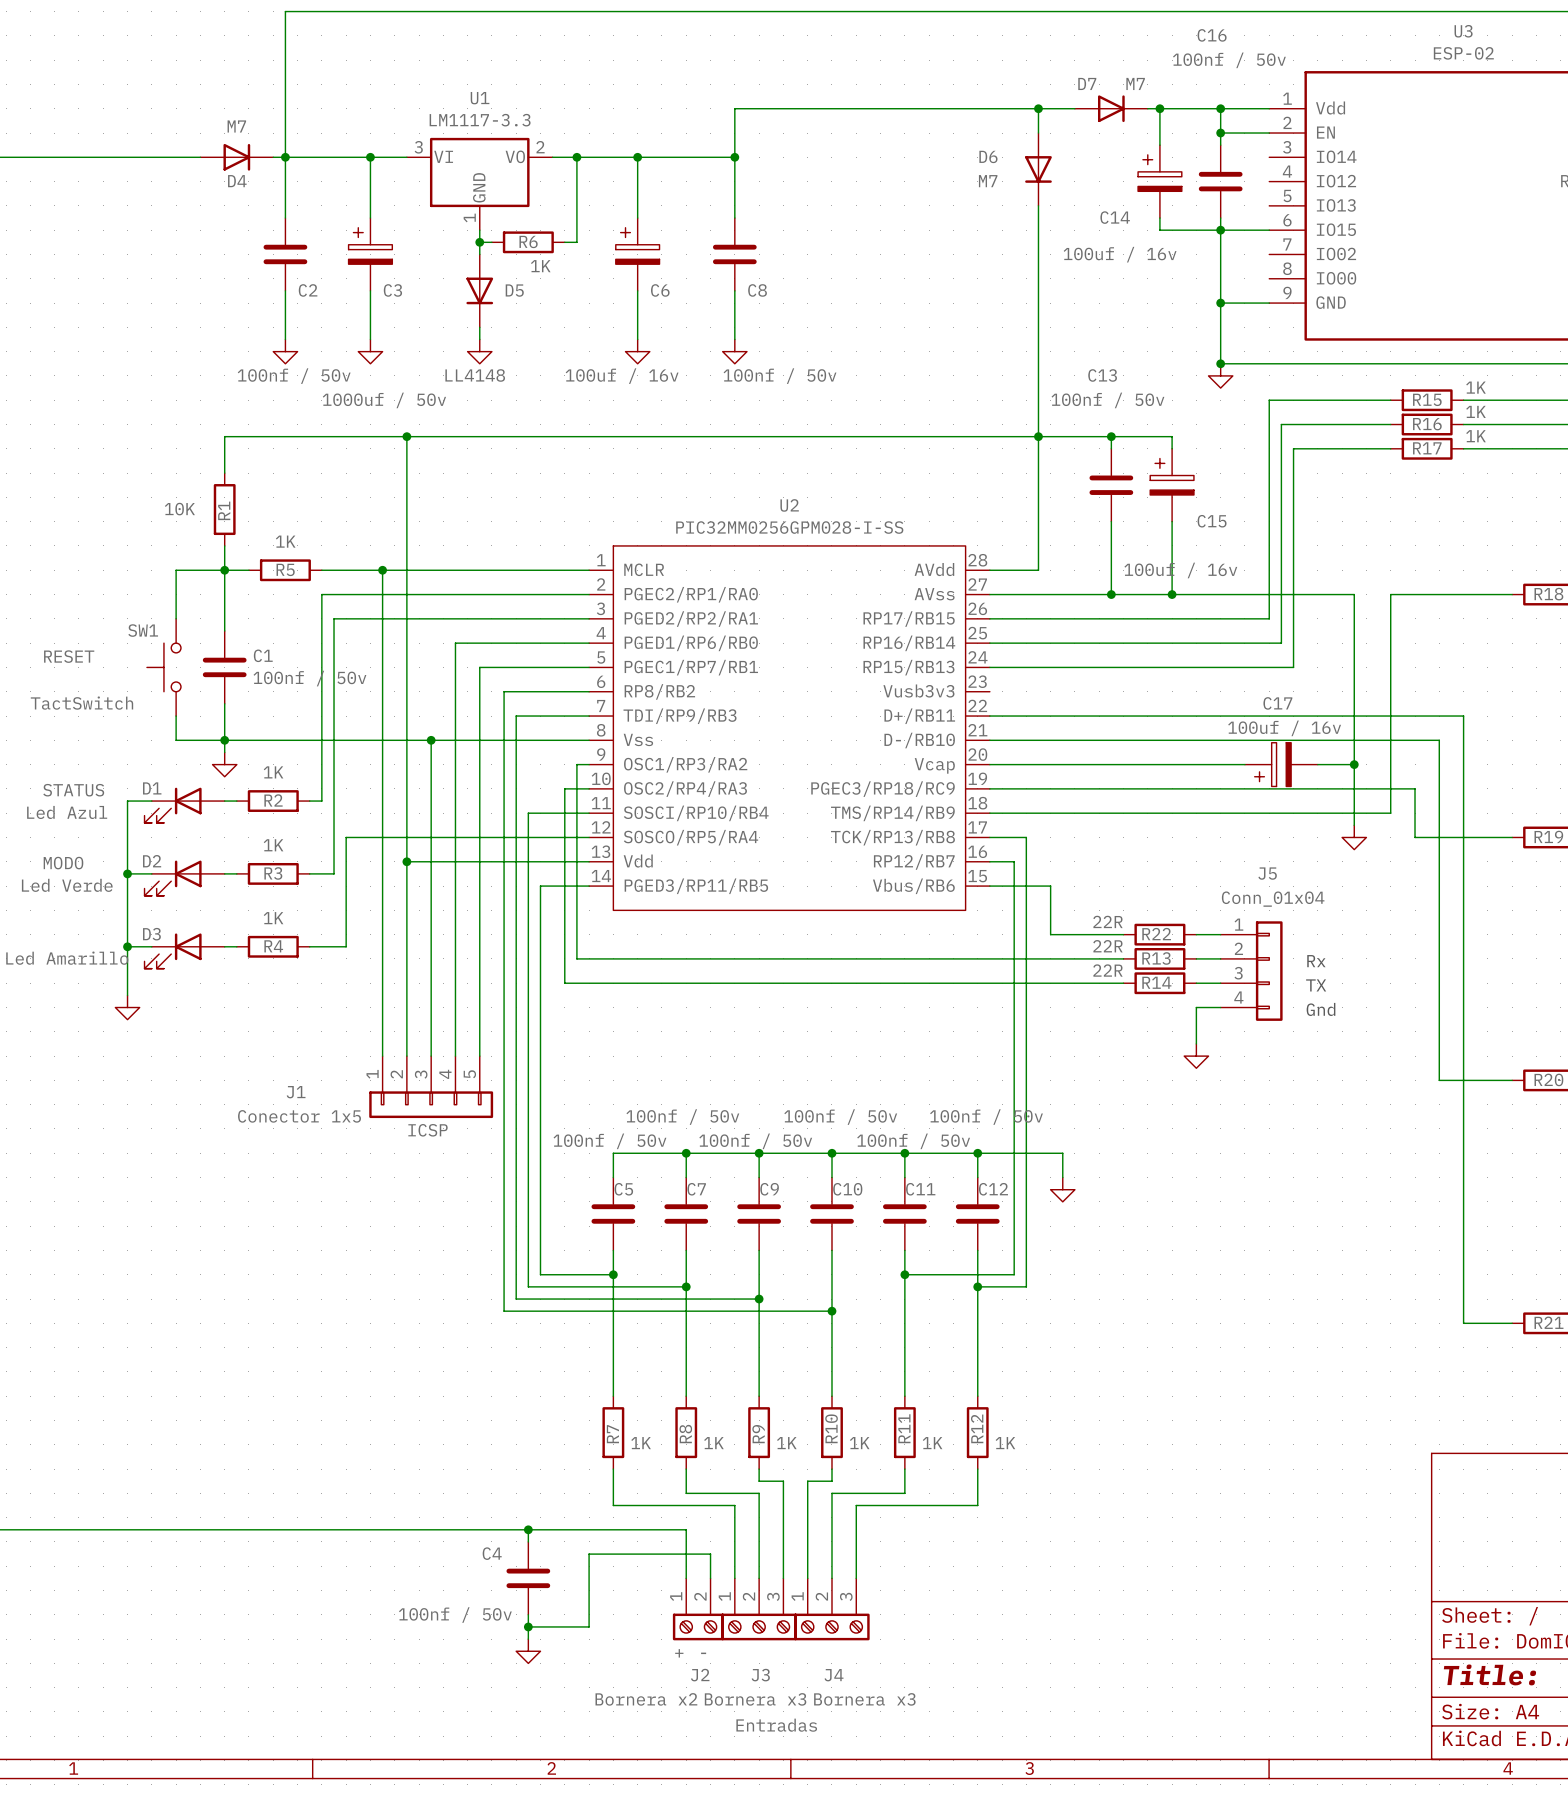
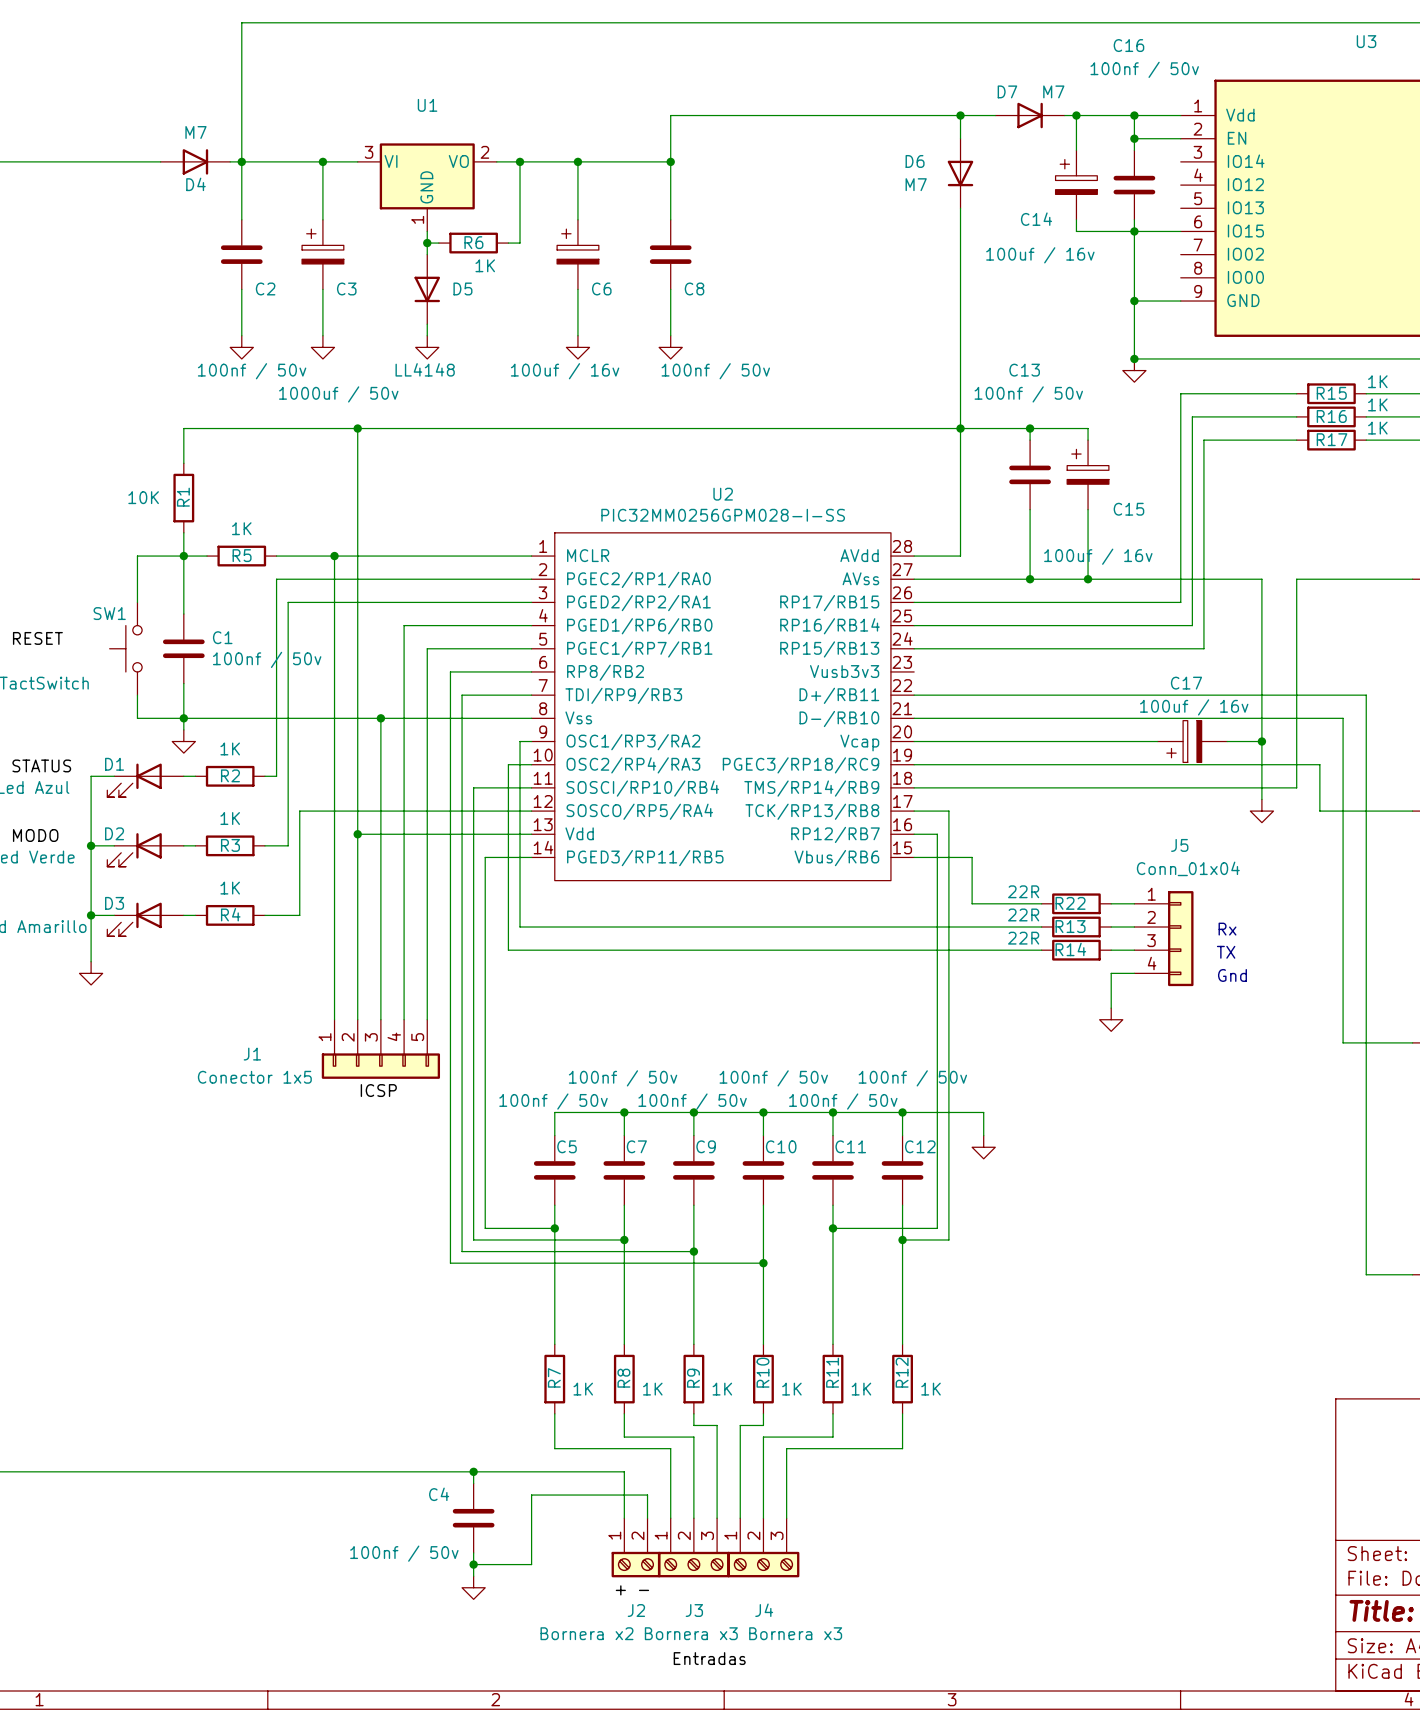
U3 value: ESP-02 (1463, 53) -> none
U1 value: LM1117-3.3 (480, 120) -> none

